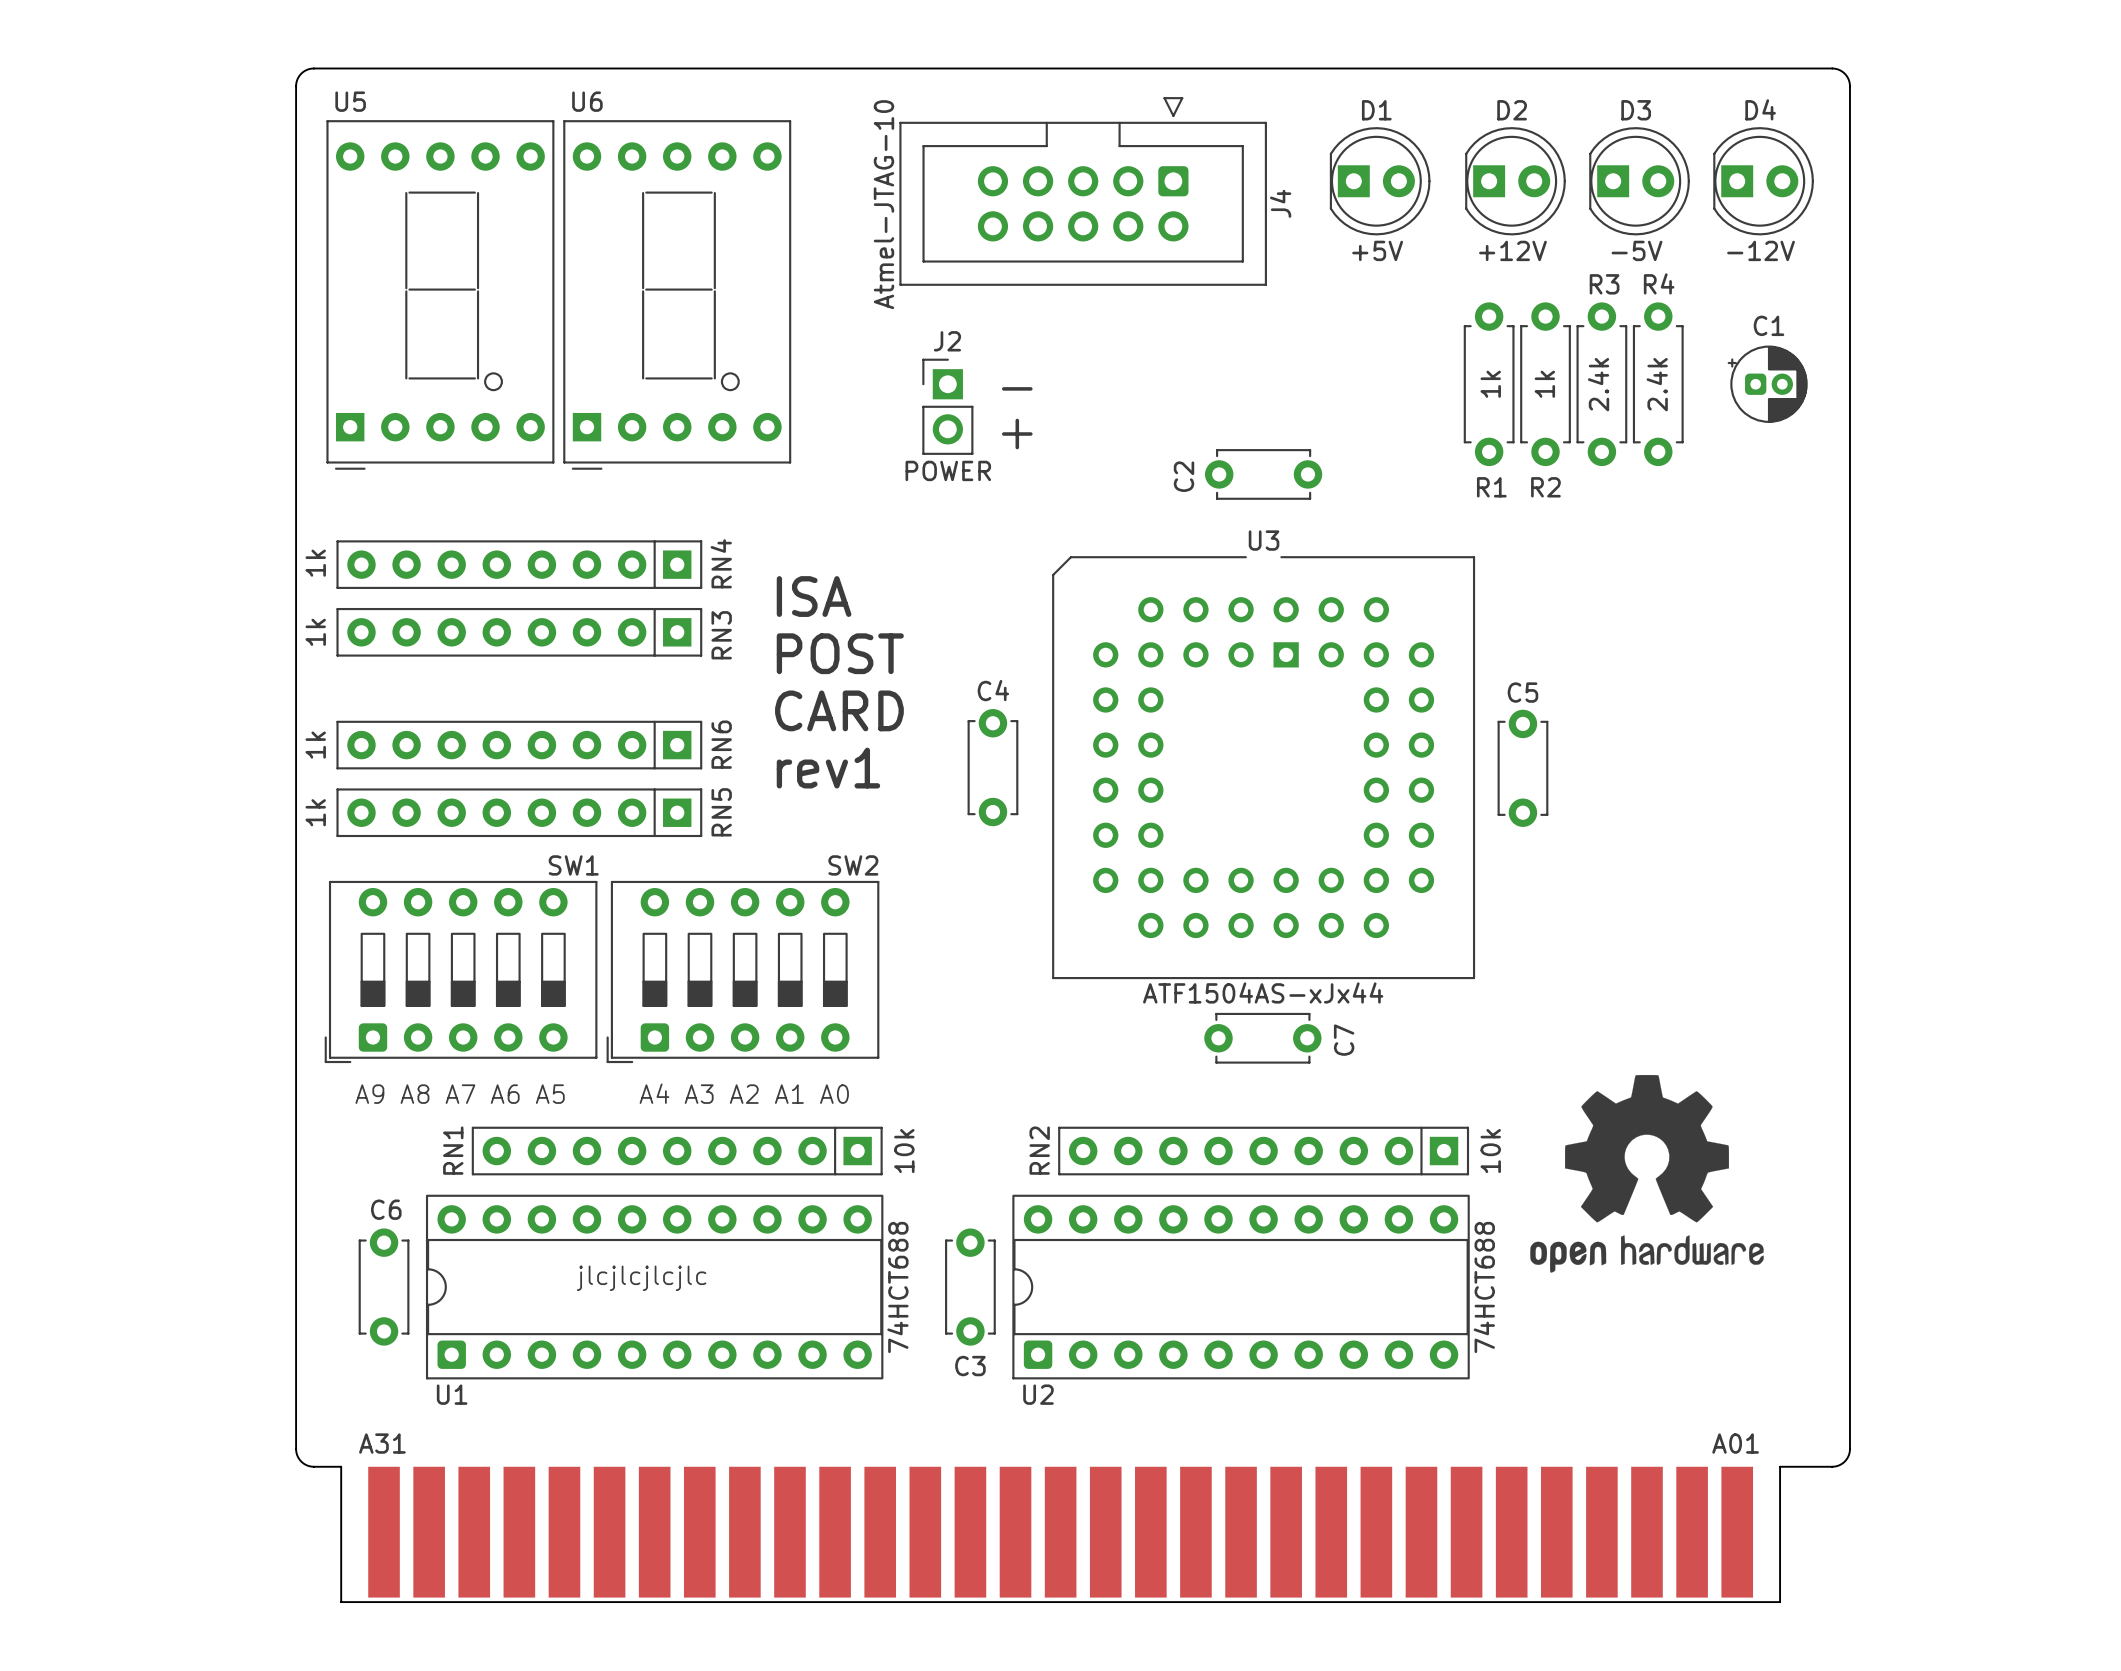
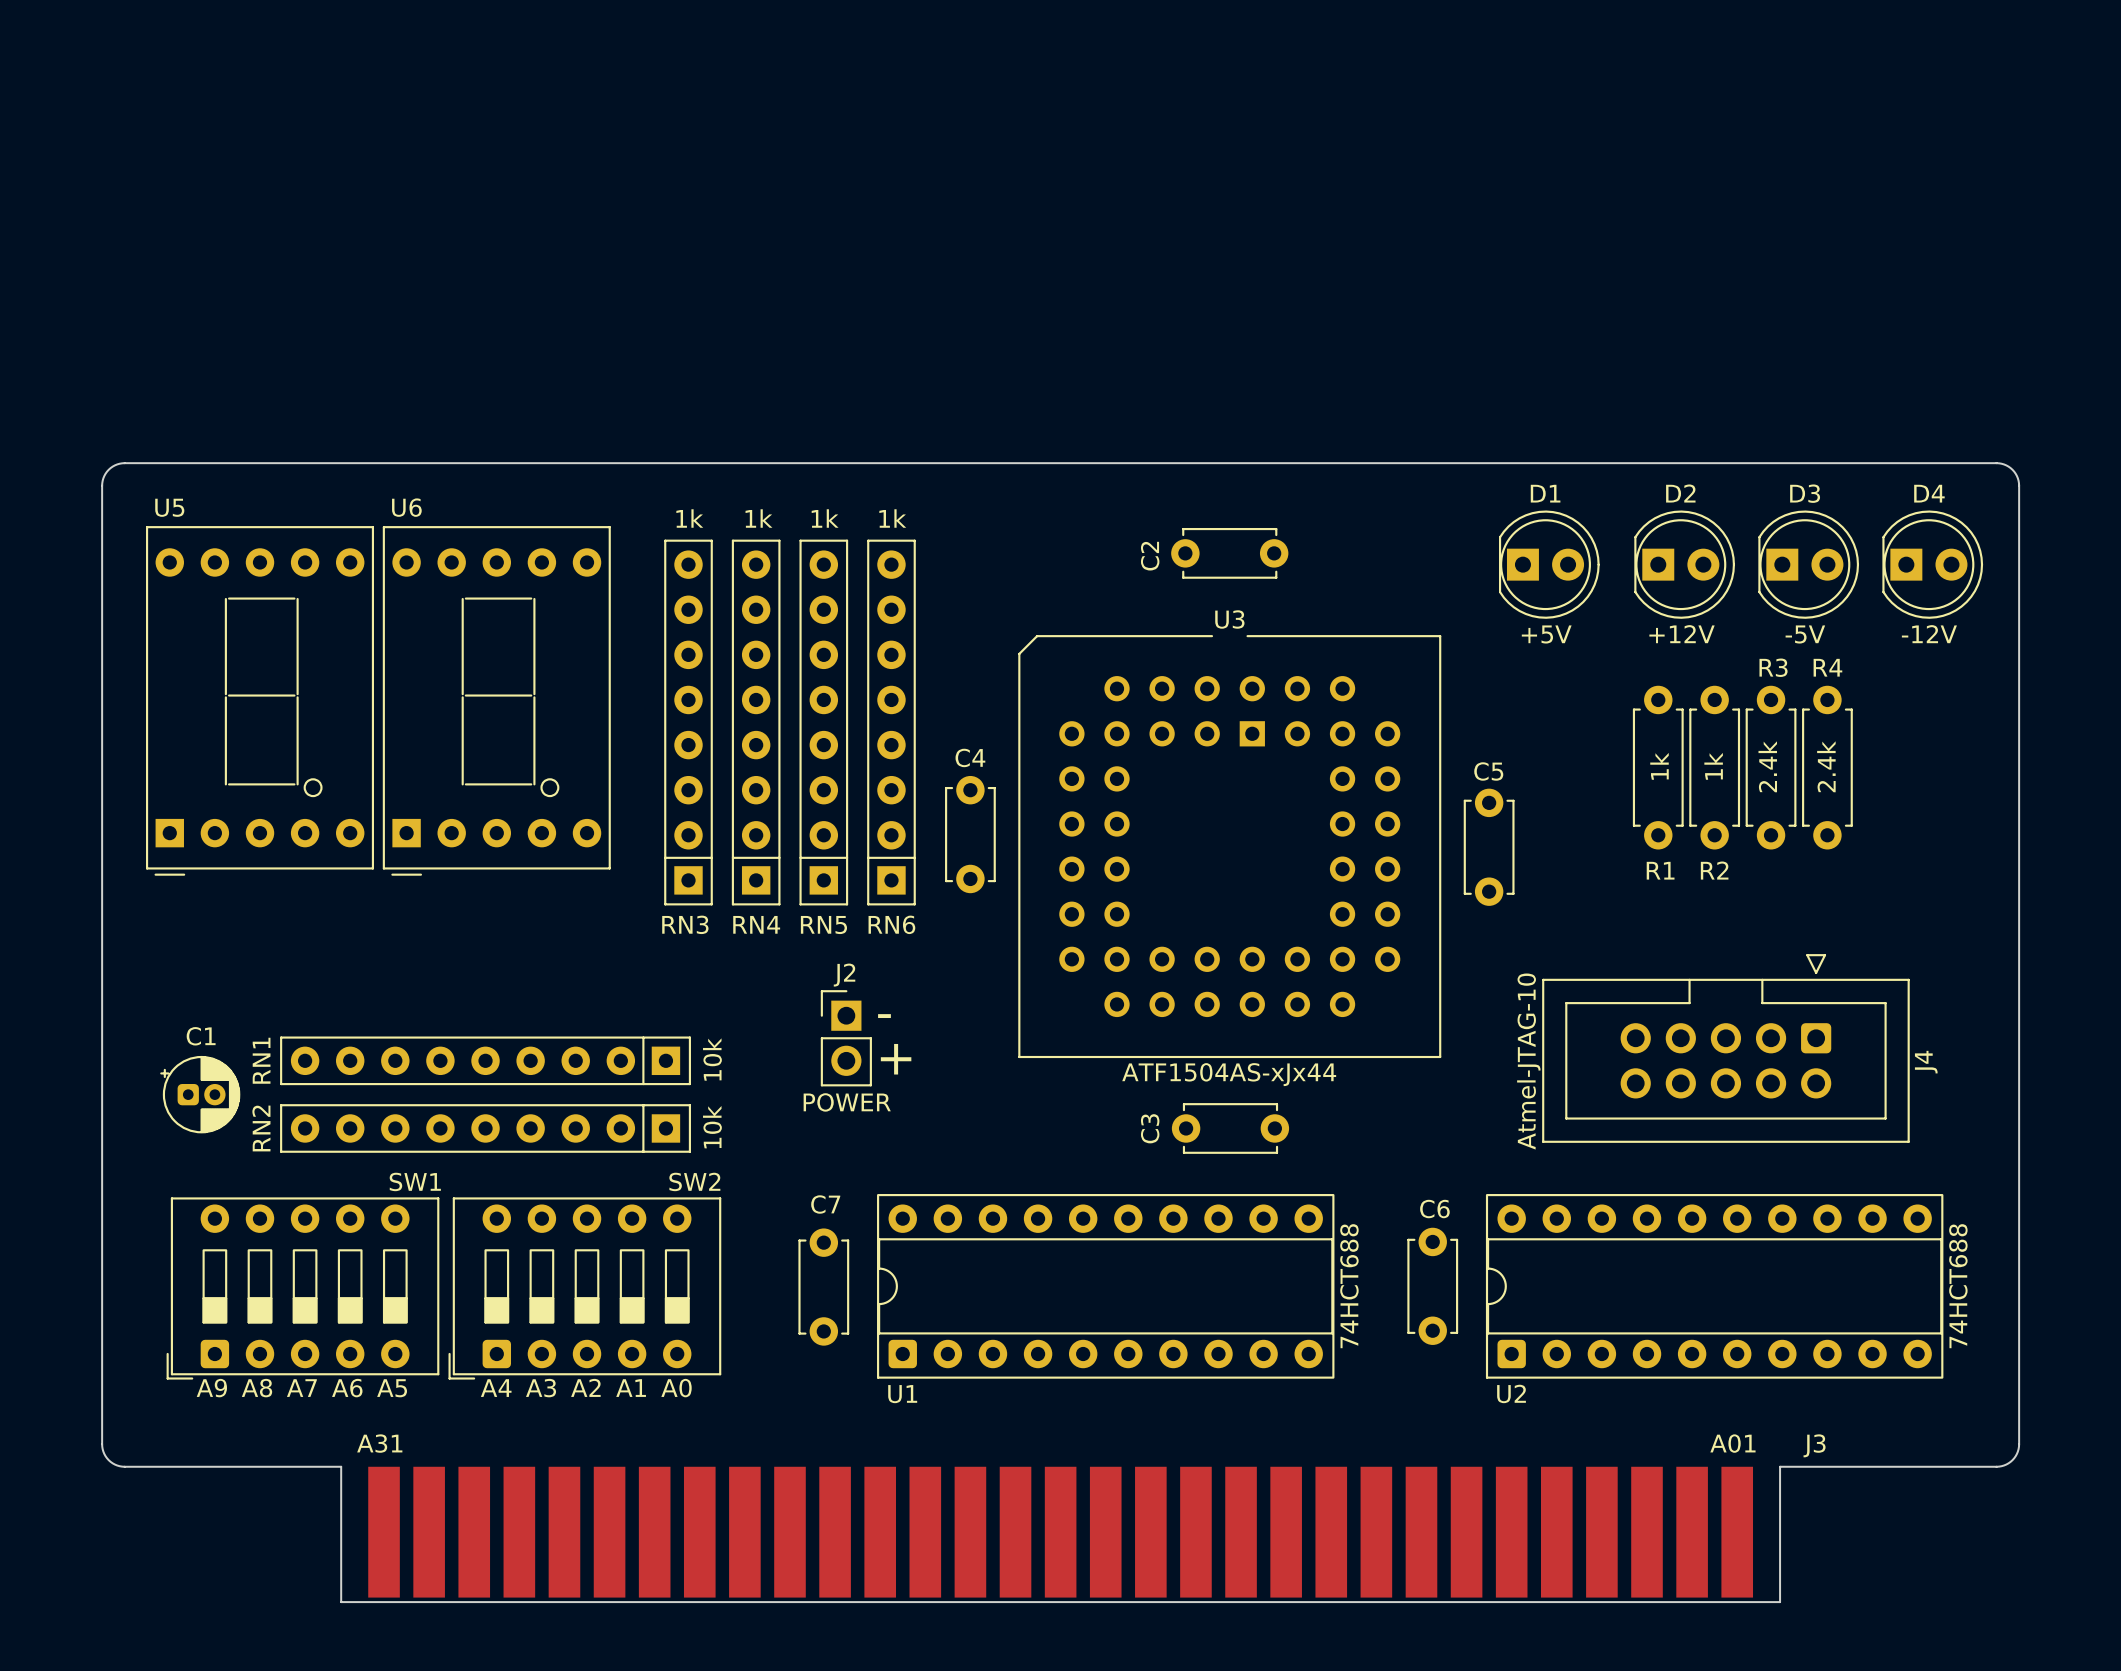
D1 position: (1380, 181) -> (1549, 564)
D2 position: (1515, 181) -> (1684, 564)
D3 position: (1639, 181) -> (1808, 564)
D4 position: (1763, 181) -> (1932, 564)
J4 position: (1083, 191) -> (1725, 1048)
U5 position: (440, 294) -> (259, 700)
U6 position: (677, 294) -> (496, 700)
R1 position: (1489, 384) -> (1658, 767)
R2 position: (1545, 384) -> (1714, 767)
R3 position: (1601, 384) -> (1771, 767)
R4 position: (1658, 384) -> (1827, 767)
C1 position: (1767, 384) -> (200, 1094)
text: - (1017, 388) -> none
J2 position: (947, 406) -> (846, 1038)
text: + (1017, 434) -> none
C2 position: (1263, 474) -> (1229, 553)
RN4 rotation: 0° (519, 564) -> 90° clockwise (756, 722)
RN4 position: (519, 564) -> (756, 722)
text: ISA (814, 596) -> none
RN3 rotation: 0° (519, 632) -> 90° clockwise (688, 722)
text: POST (840, 653) -> none
text: CARD (839, 710) -> none
RN6 rotation: 0° (519, 745) -> 90° clockwise (891, 722)
RN6 position: (519, 745) -> (891, 722)
C4 position: (992, 767) -> (970, 834)
U3 position: (1263, 767) -> (1229, 846)
text: rev1 (828, 768) -> none
C5 position: (1522, 768) -> (1489, 847)
RN5 rotation: 0° (519, 812) -> 90° clockwise (823, 722)
RN5 position: (519, 812) -> (823, 722)
SW1 position: (461, 971) -> (302, 1288)
SW2 position: (742, 971) -> (584, 1288)
text: none -> - (884, 1016)
C7 rotation: 0° (1262, 1038) -> 90° clockwise (823, 1287)
C7 position: (1262, 1038) -> (823, 1287)
C7 name position: C7 (1344, 1040) -> C7 (825, 1204)
text: none -> + (896, 1059)
drawing: [1530, 1074, 1764, 1273] -> none
text position: A4 (654, 1093) -> A4 (496, 1388)
text position: A9 (369, 1094) -> A9 (211, 1388)
text position: A8 (414, 1094) -> A8 (257, 1388)
text position: A7 (460, 1094) -> A7 (301, 1388)
text position: A6 (505, 1094) -> A6 (347, 1388)
text position: A5 (550, 1094) -> A5 (392, 1388)
text position: A3 (699, 1094) -> A3 (541, 1388)
text position: A2 (744, 1094) -> A2 (585, 1387)
text position: A1 (789, 1094) -> A1 (631, 1388)
text position: A0 (834, 1094) -> A0 (676, 1388)
RN1 position: (677, 1151) -> (485, 1060)
RN2 position: (1263, 1151) -> (485, 1128)
text: jlcjlcjlcjlc (641, 1278) -> none
C6 position: (384, 1287) -> (1432, 1286)
U1 position: (654, 1287) -> (1105, 1286)
C3 rotation: 0° (970, 1287) -> 90° clockwise (1230, 1128)
C3 position: (970, 1287) -> (1230, 1128)
U2 position: (1241, 1287) -> (1714, 1286)
J3 name: none -> J3 (1814, 1445)
board edge: (313, 1466) (301, 1461) (296, 1449) (296, 86) (301, 73) (313, 68) (1832, 68) (1844, 73) (1849, 86) (1849, 1449) (1844, 1461) (1832, 1466) -> (313, 1466) (122, 1466) (108, 1460) (102, 1449) (102, 485) (107, 471) (119, 463) (1996, 463) (2008, 466) (2016, 475) (2019, 485) (2018, 1449) (2012, 1460) (1999, 1466) (1832, 1466)

